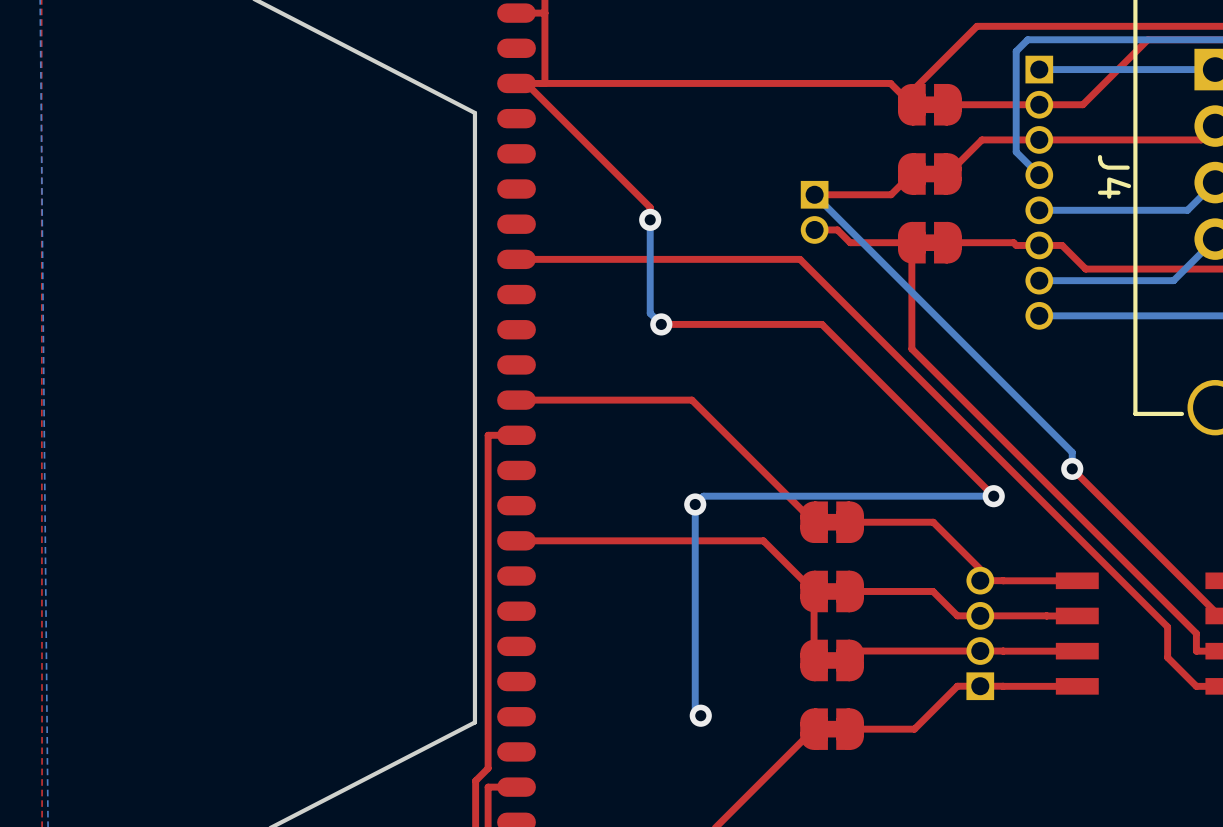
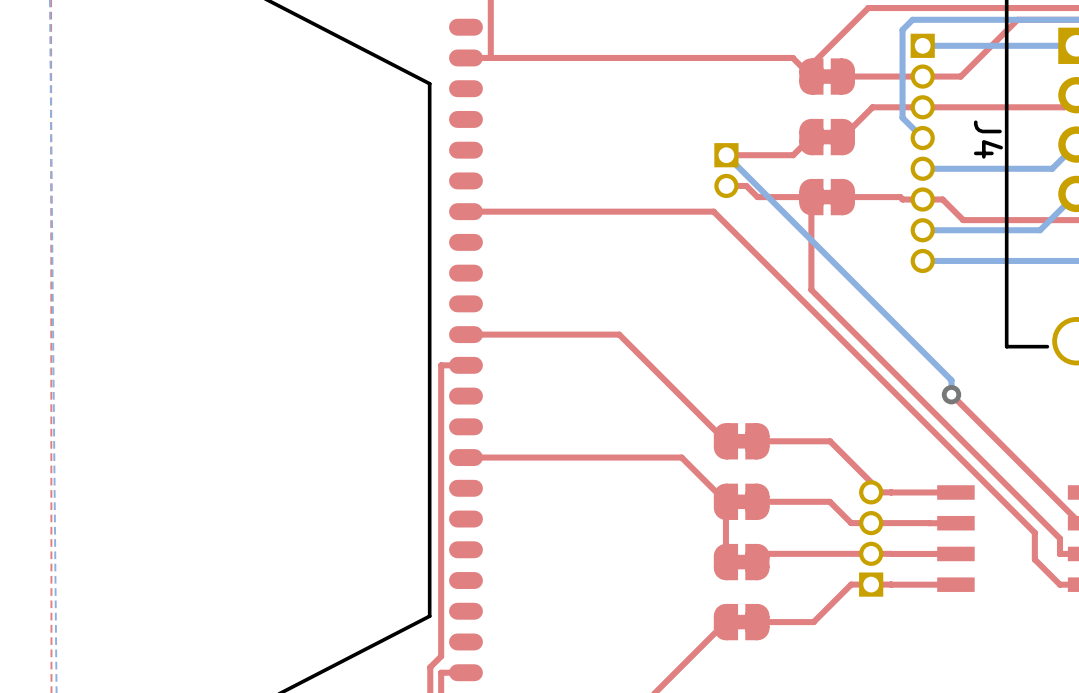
top track: (526, 83) (650, 207) (650, 219) -> none
bottom track: (650, 219) (650, 313) (661, 324) -> none
via: (650, 219) -> none
top track: (661, 324) (821, 324) (993, 496) -> none
via: (661, 324) -> none
bottom track: (993, 496) (703, 496) (695, 504) (695, 710) (700, 715) -> none
via: (993, 496) -> none
via: (695, 504) -> none
via: (700, 715) -> none

